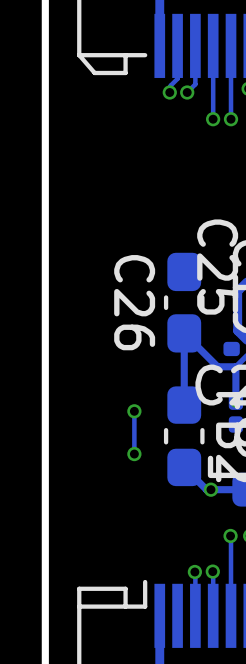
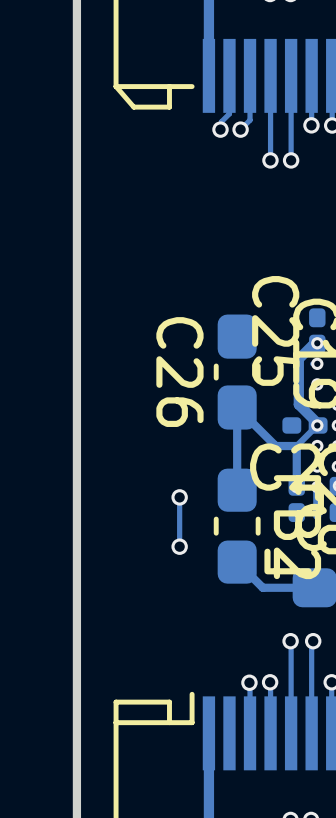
via: (210, 489) -> none

